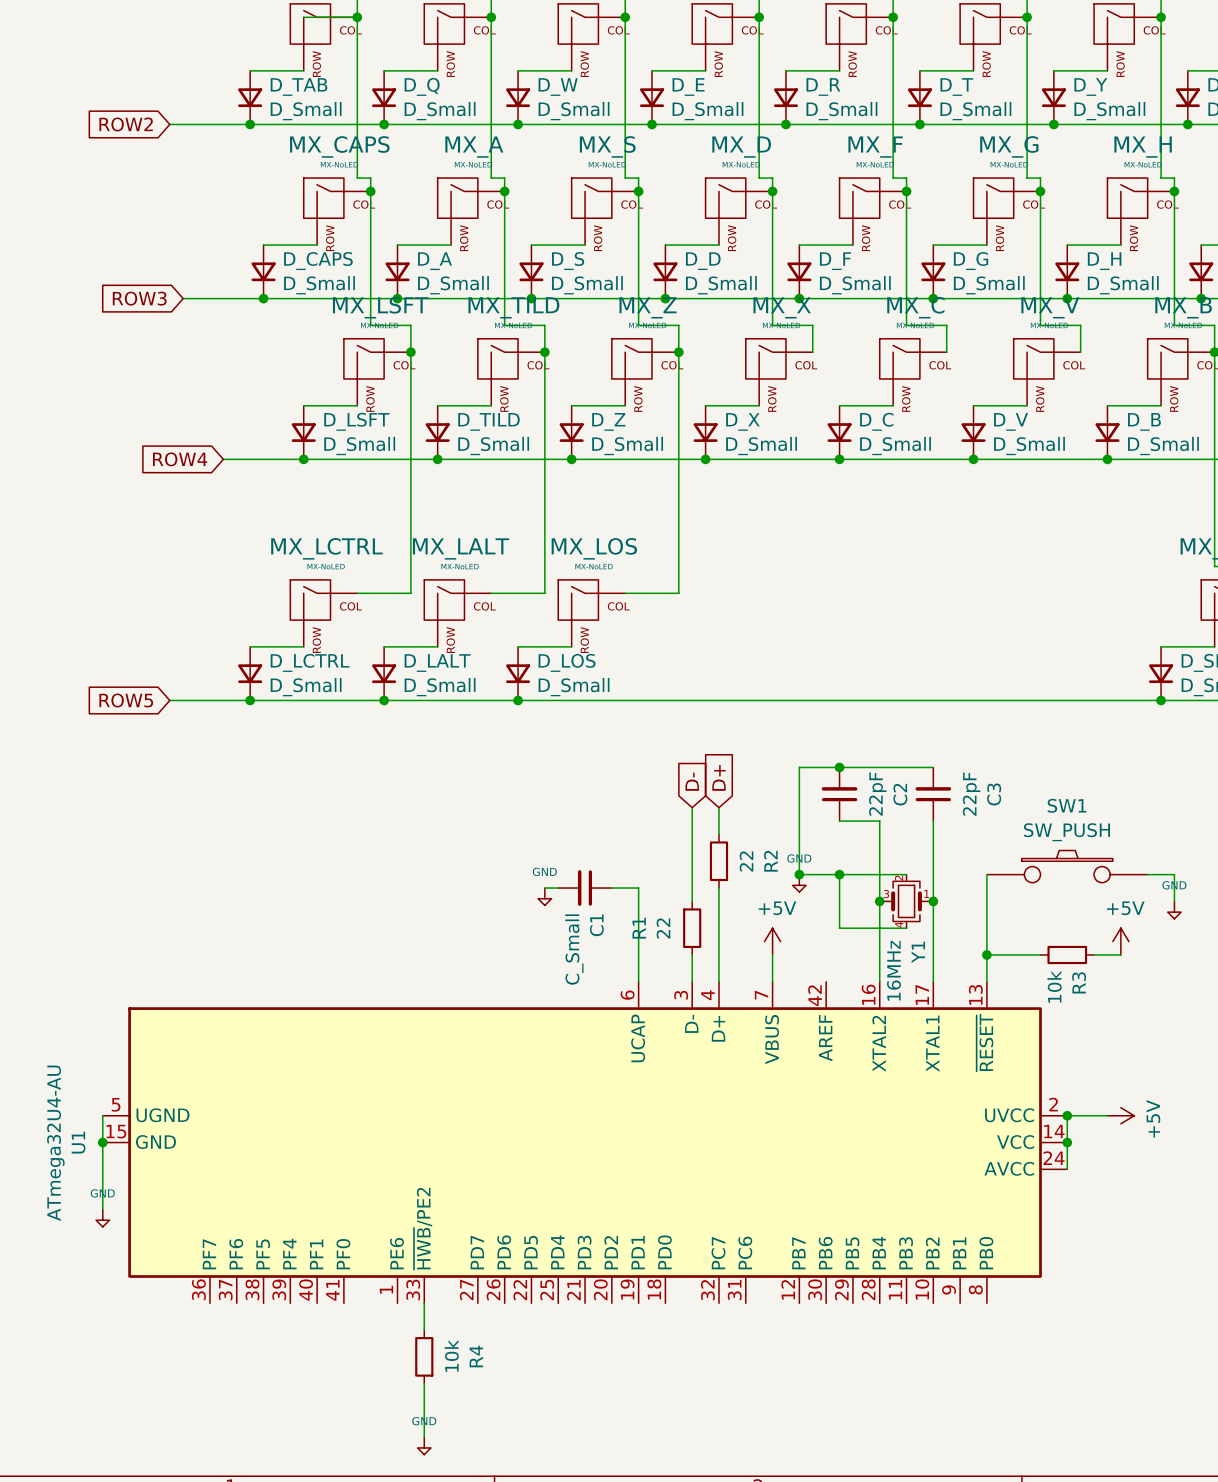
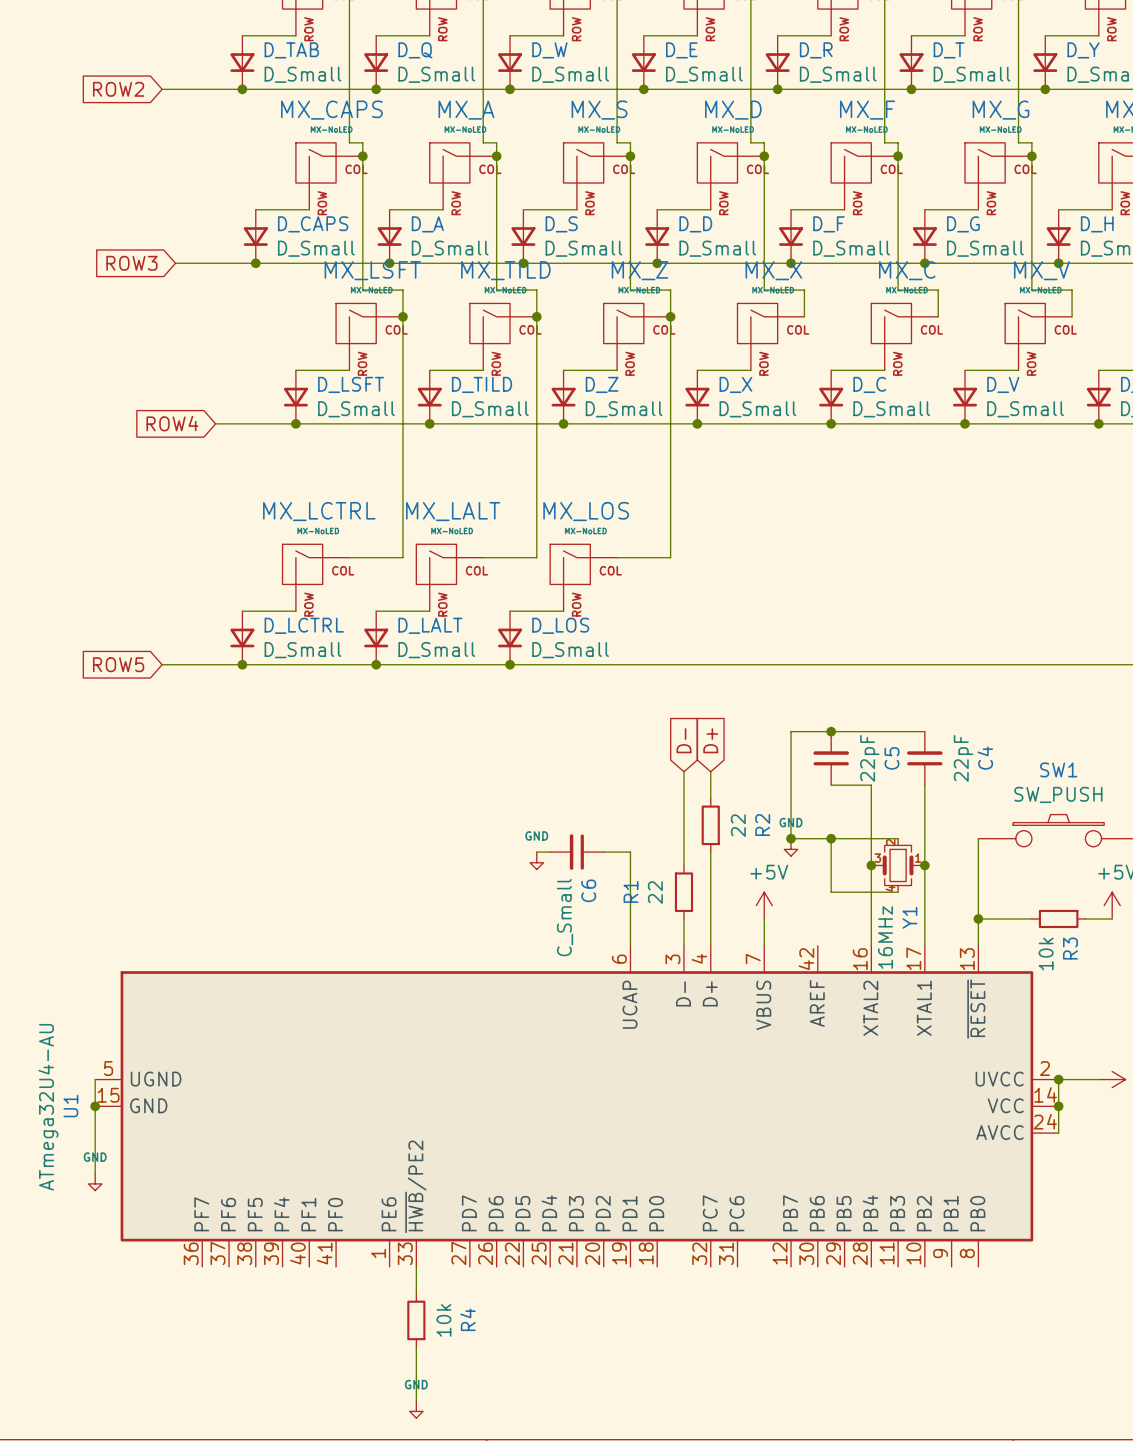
C2 name: C2 (900, 794) -> C5 (891, 758)
C3 name: C3 (994, 794) -> C4 (985, 758)
C1 name: C1 (596, 925) -> C6 (588, 890)

